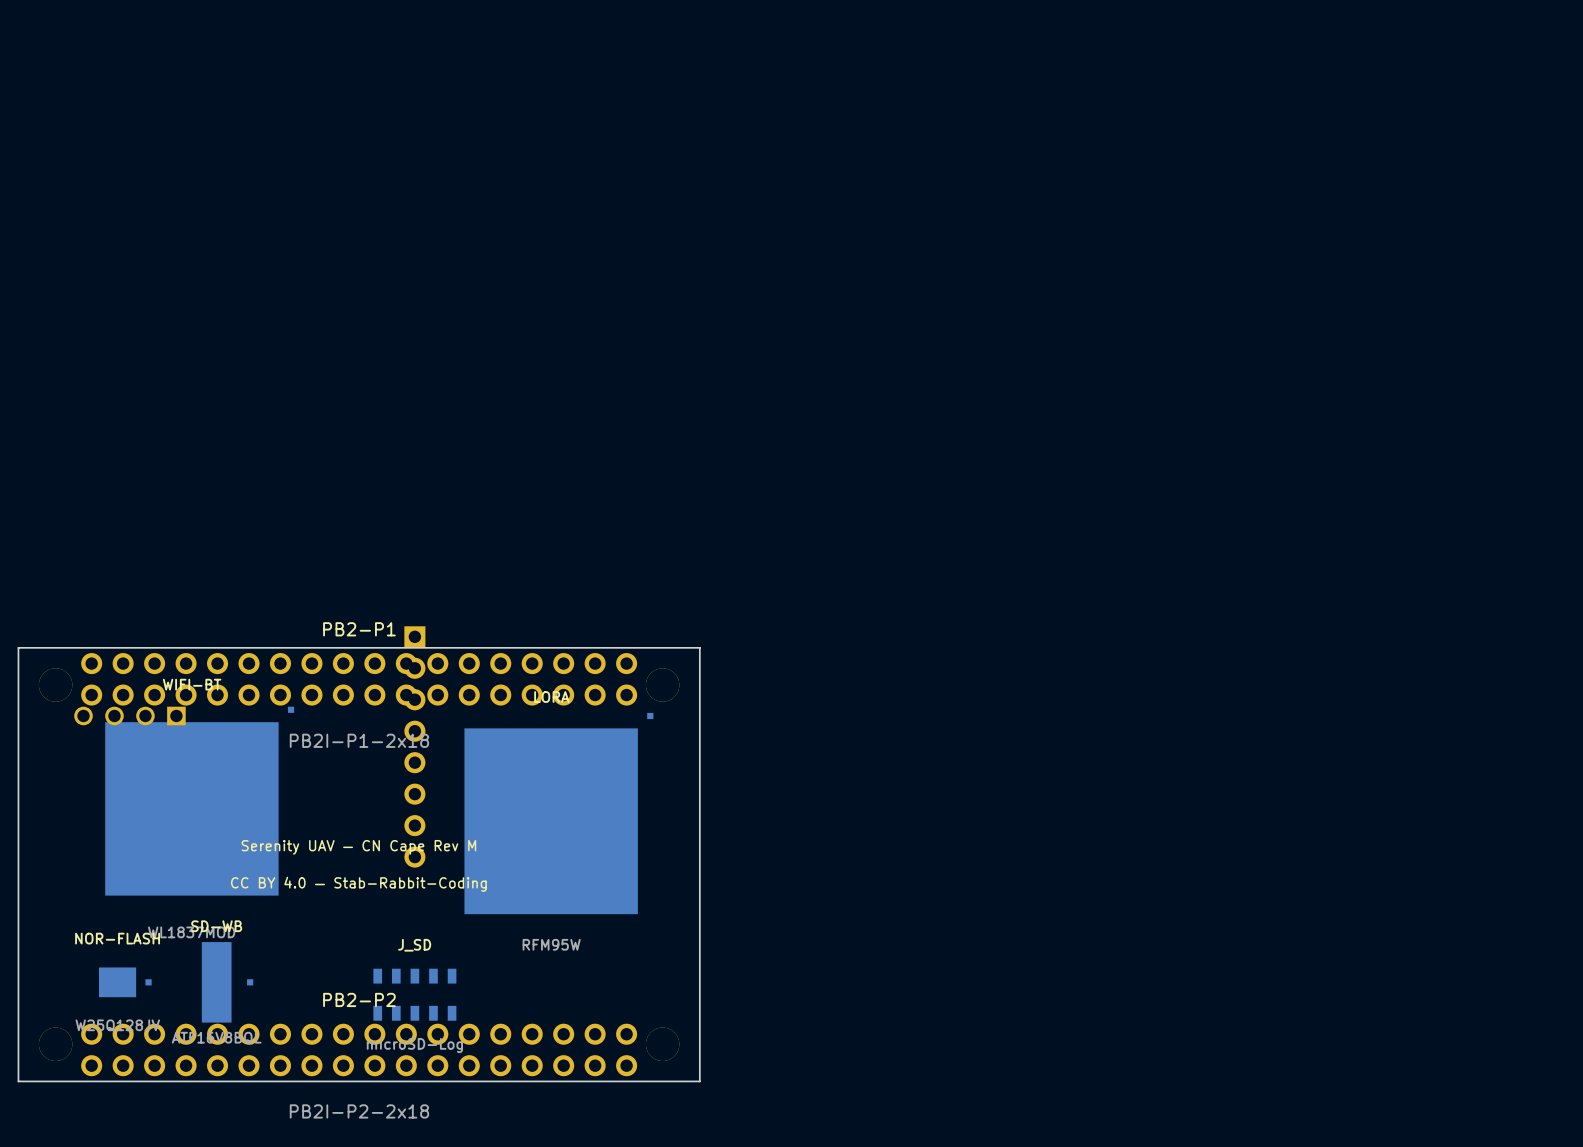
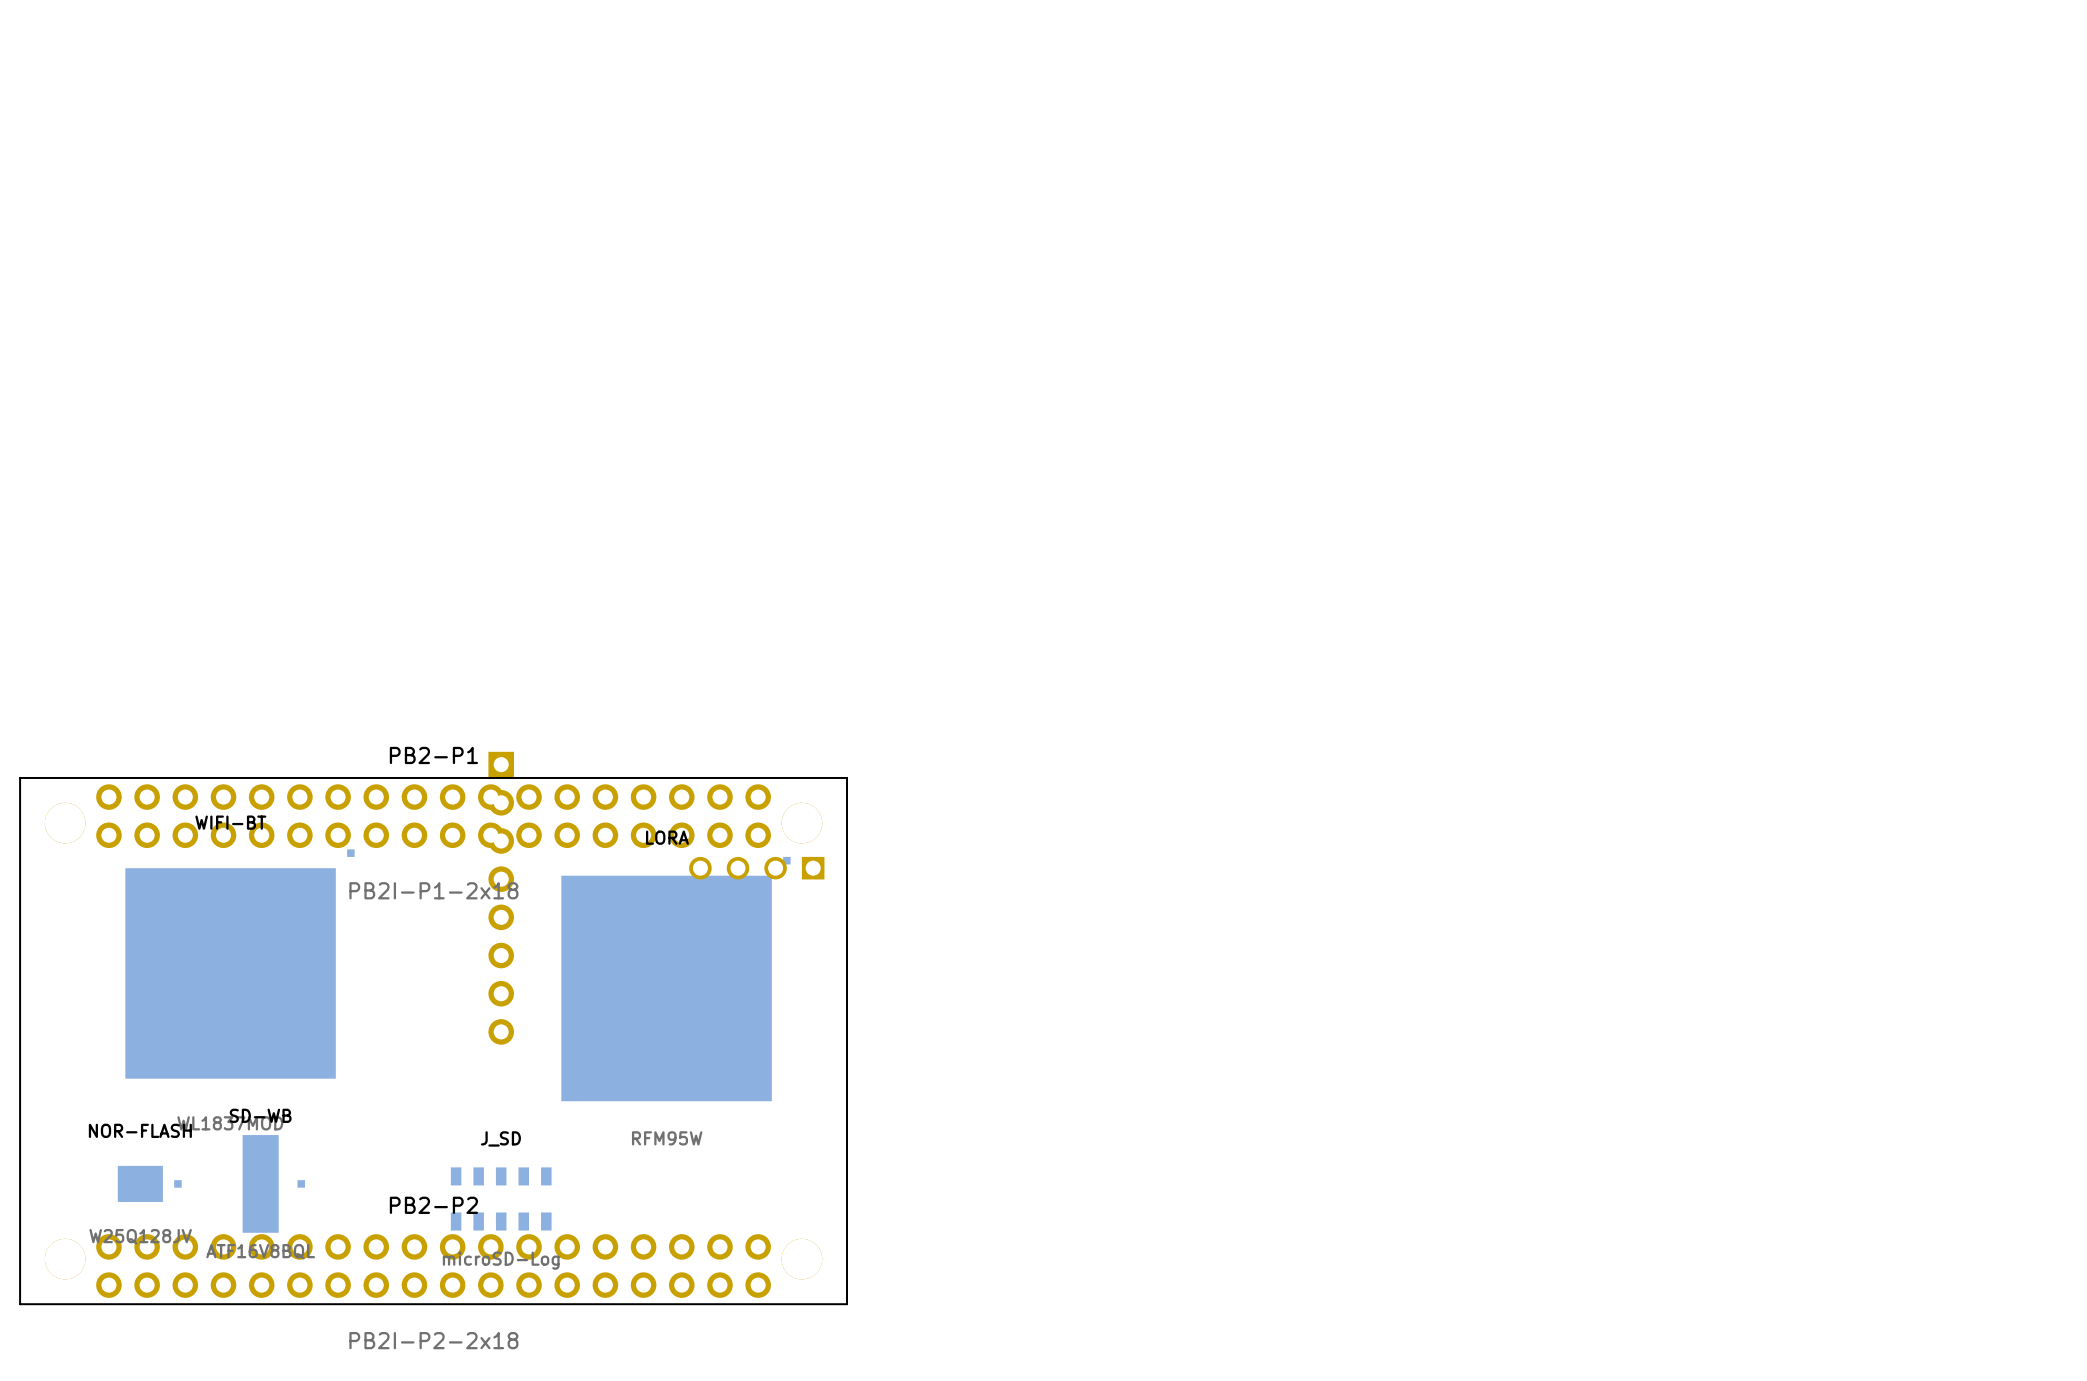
part: (129, 715) -> none
part: none -> (756, 868)
text: Serenity UAV — CN Cape Rev M (358, 847) -> none
text: CC BY 4.0 — Stab-Rabbit-Coding (358, 884) -> none

